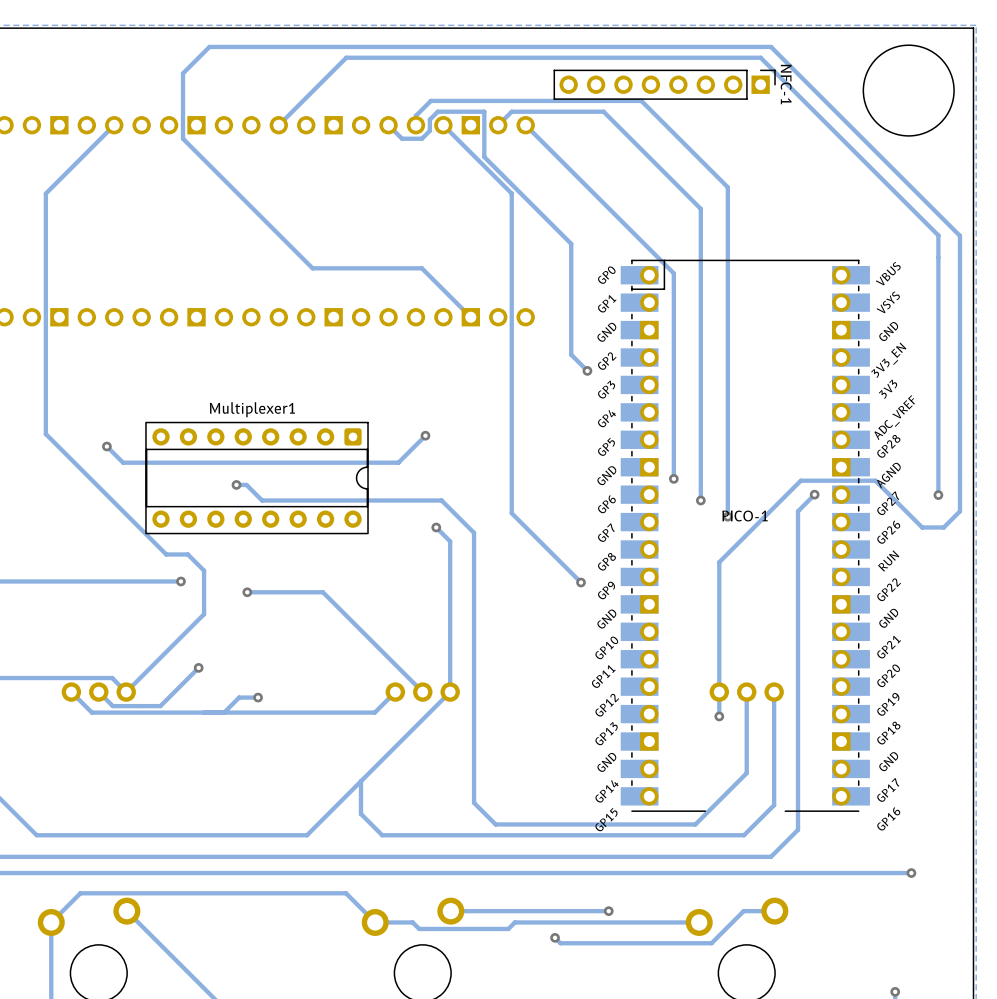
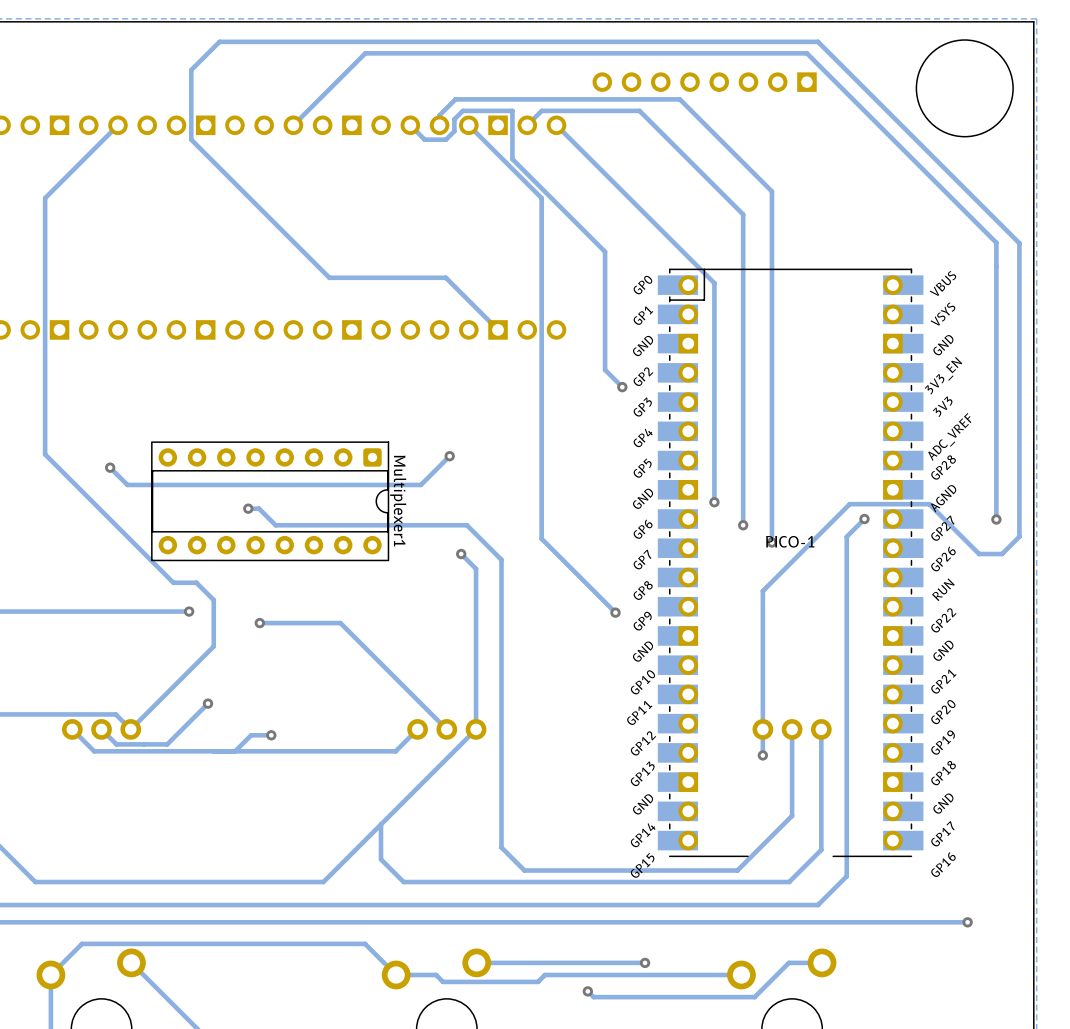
NFC-1 side: bottom (664, 84) -> top (704, 82)
Multiplexer1 name rotation: 0° (252, 409) -> 90° clockwise (398, 501)
Multiplexer1 name position: Multiplexer1 (252, 409) -> Multiplexer1 (398, 501)

